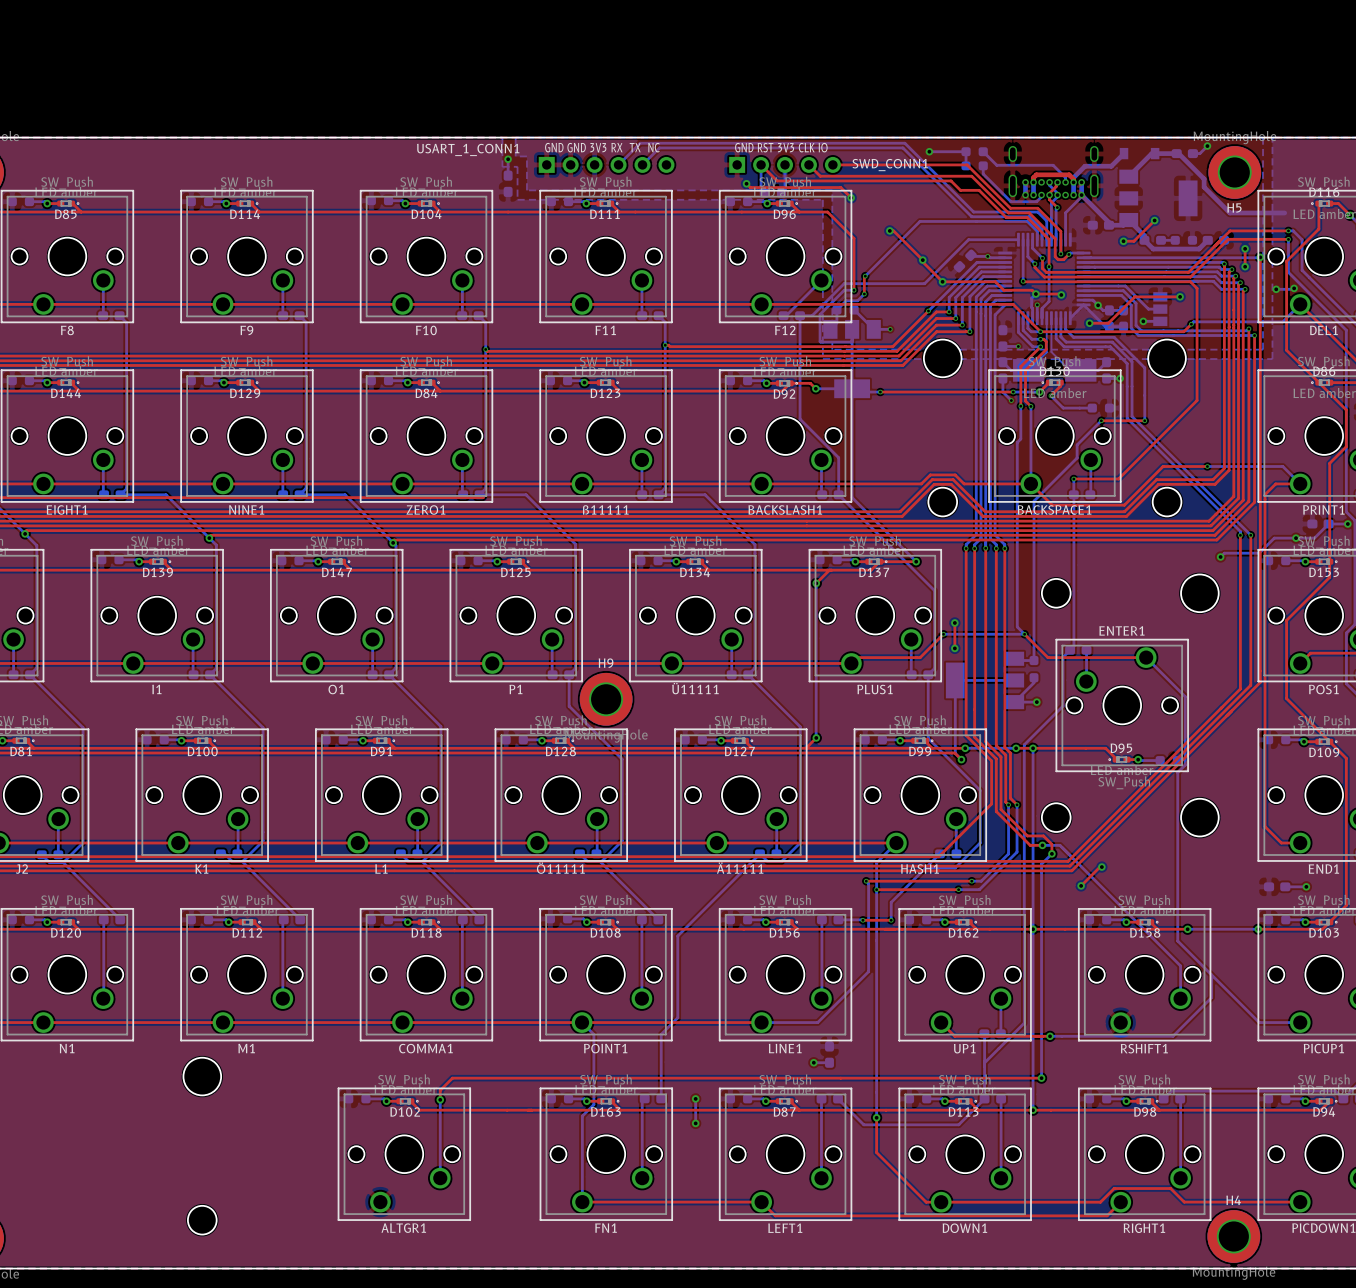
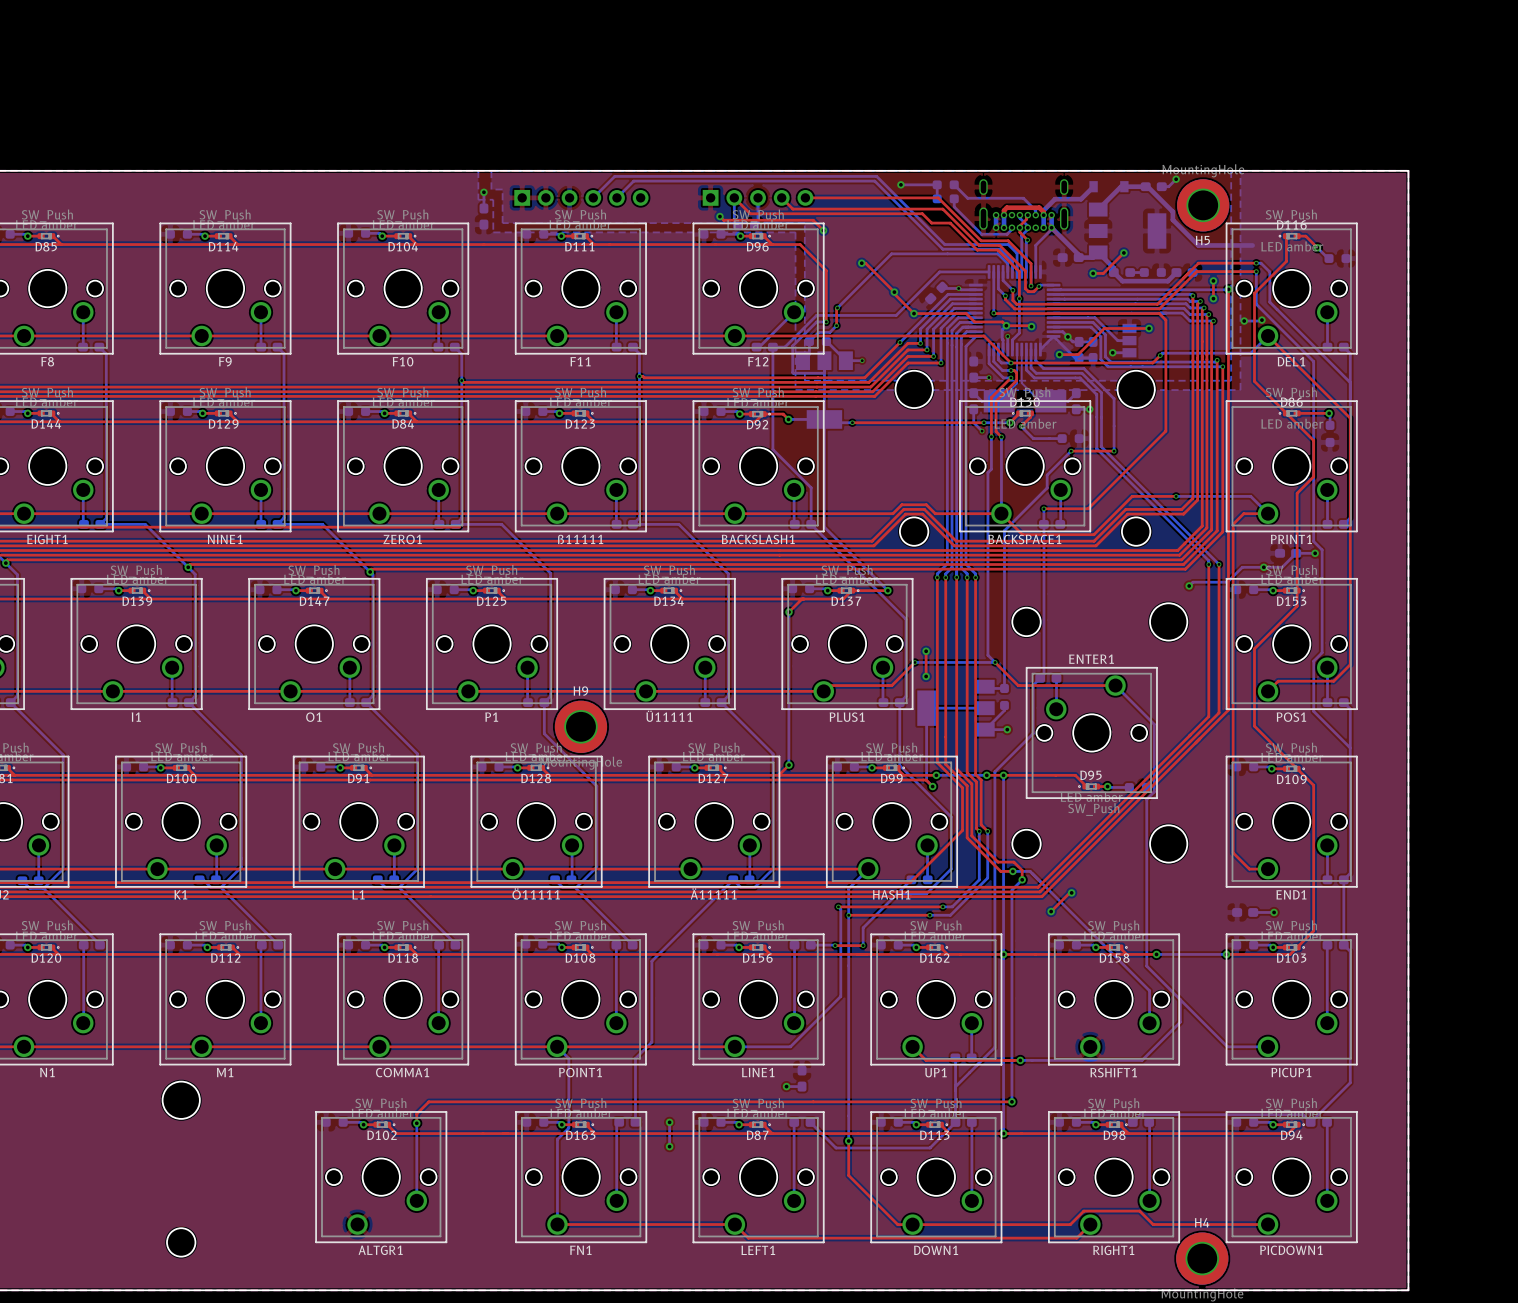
text: GND GND 3V3 RX TX NC (602, 147) -> none
text: GND RST 3V3 CLK IO (781, 147) -> none
USART_1_CONN1 name: USART_1_CONN1 (468, 149) -> none
SWD_CONN1 name: SWD_CONN1 (890, 165) -> none

